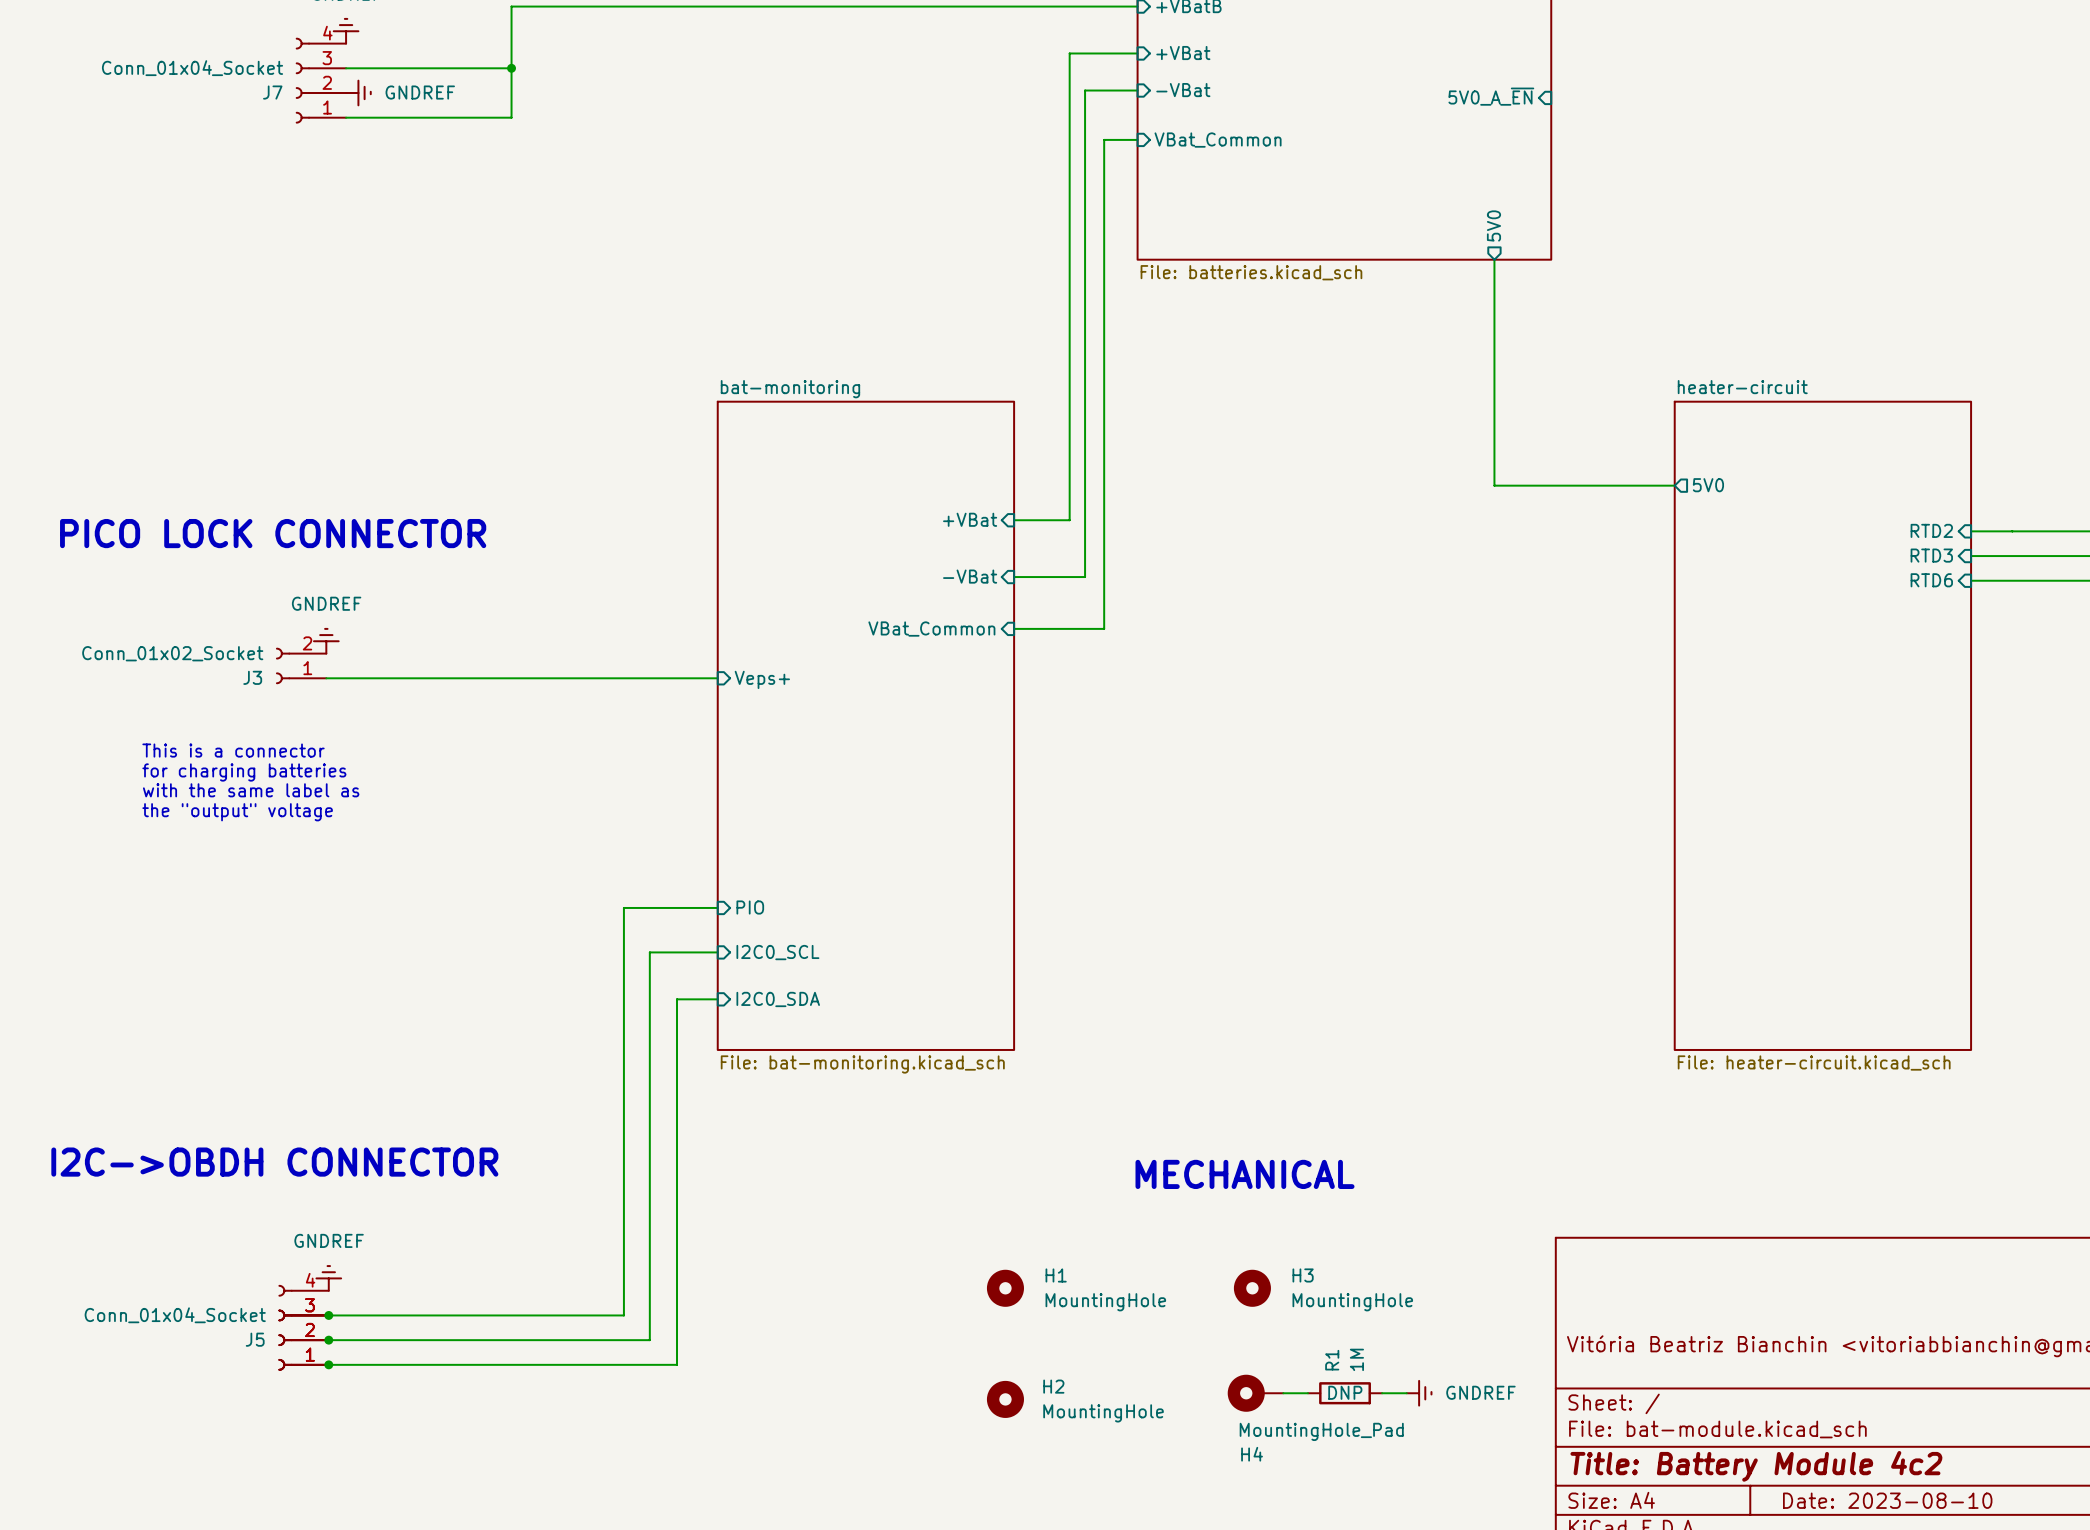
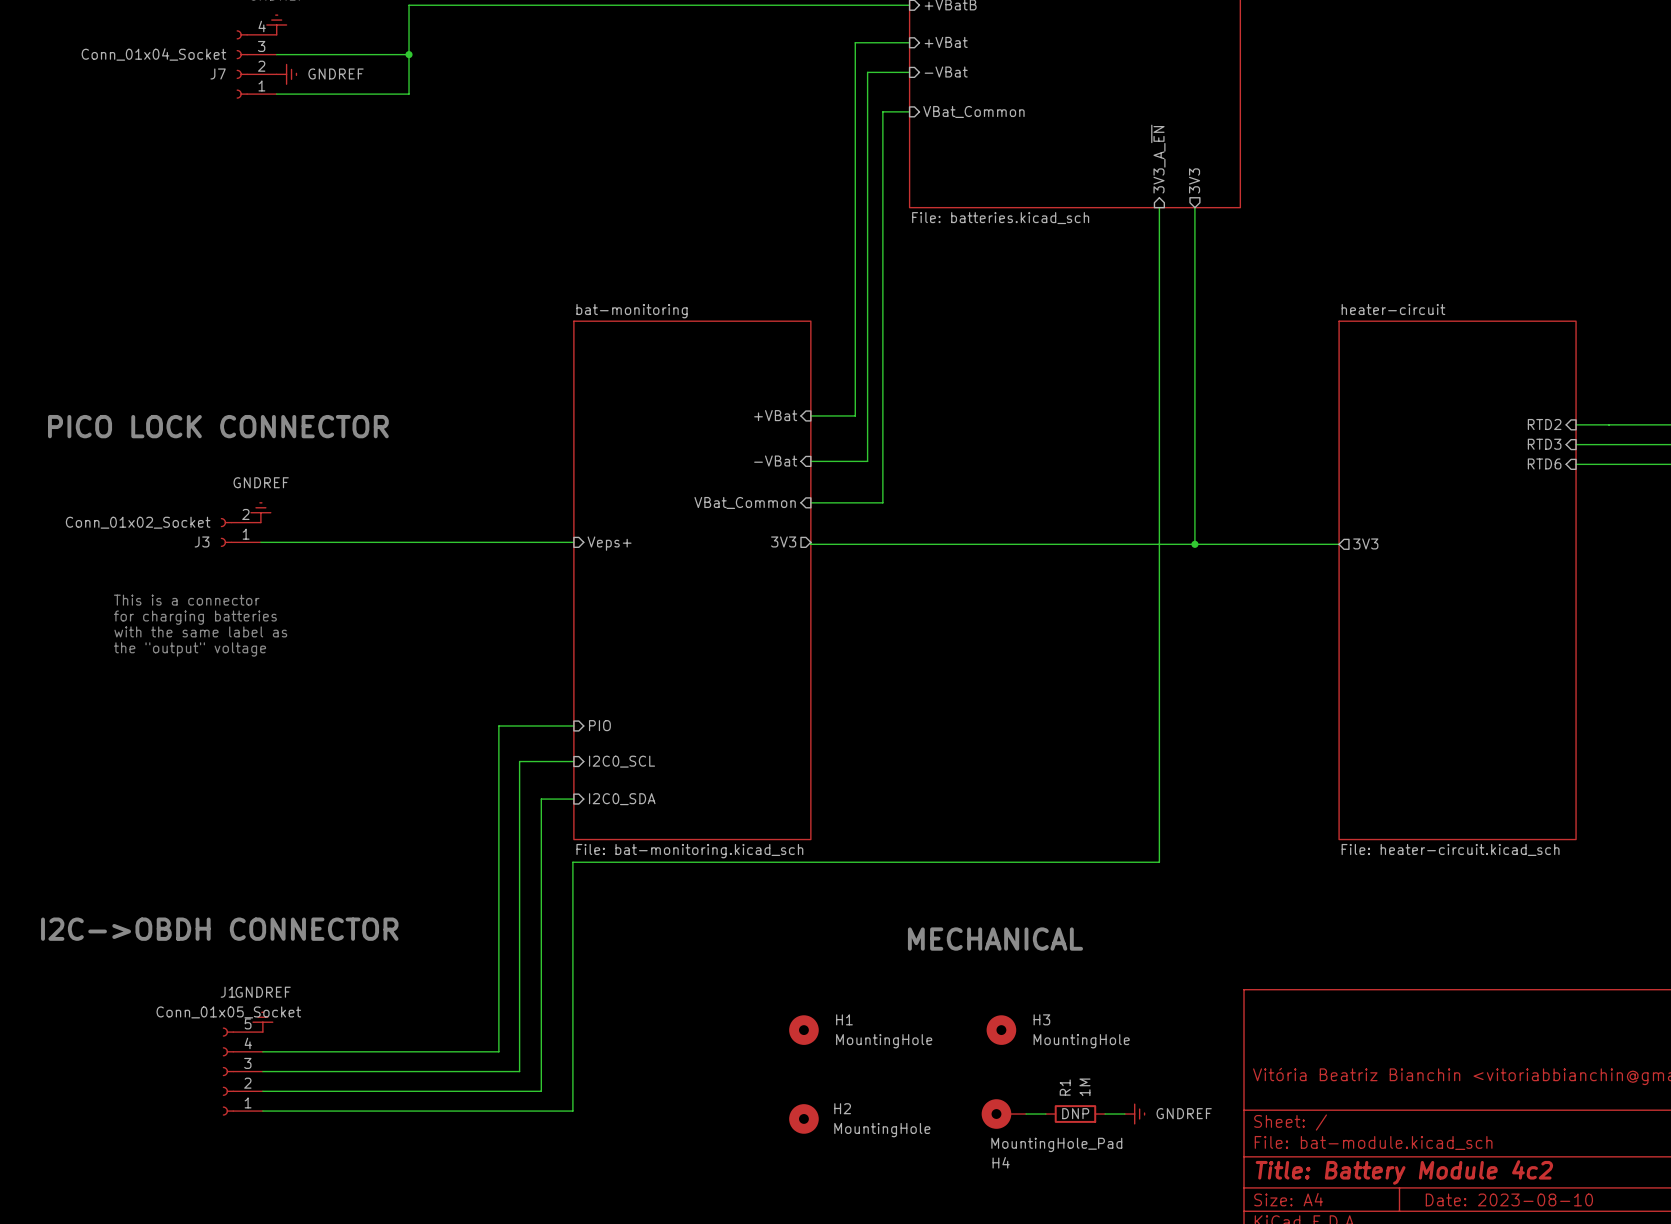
sheet pin: 5V0_A_~{EN} (1491, 96) -> 3V3_A_~{EN} (1158, 159)
sheet pin: 5V0 (1493, 225) -> 3V3 (1194, 180)
wire: none -> (1159, 207) (1159, 862) (572, 862) (572, 1111) (262, 1111)
wire: (1494, 485) (1674, 485) -> (1194, 388) (1194, 544)
sheet pin: 5V0 (1708, 485) -> none
sheet pin: none -> 3V3 (783, 541)
wire: none -> (810, 542) (810, 544) (1339, 544)
junction: none -> (1194, 544)
sheet pin: none -> 3V3 (1365, 543)
junction: (328, 1315) -> none
J5: Conn_01x04_Socket (303, 1327) -> none
part: (303, 1340) -> none
J1: none -> Conn_01x05_Socket (242, 1071)
junction: (328, 1340) -> none
junction: (328, 1364) -> none

